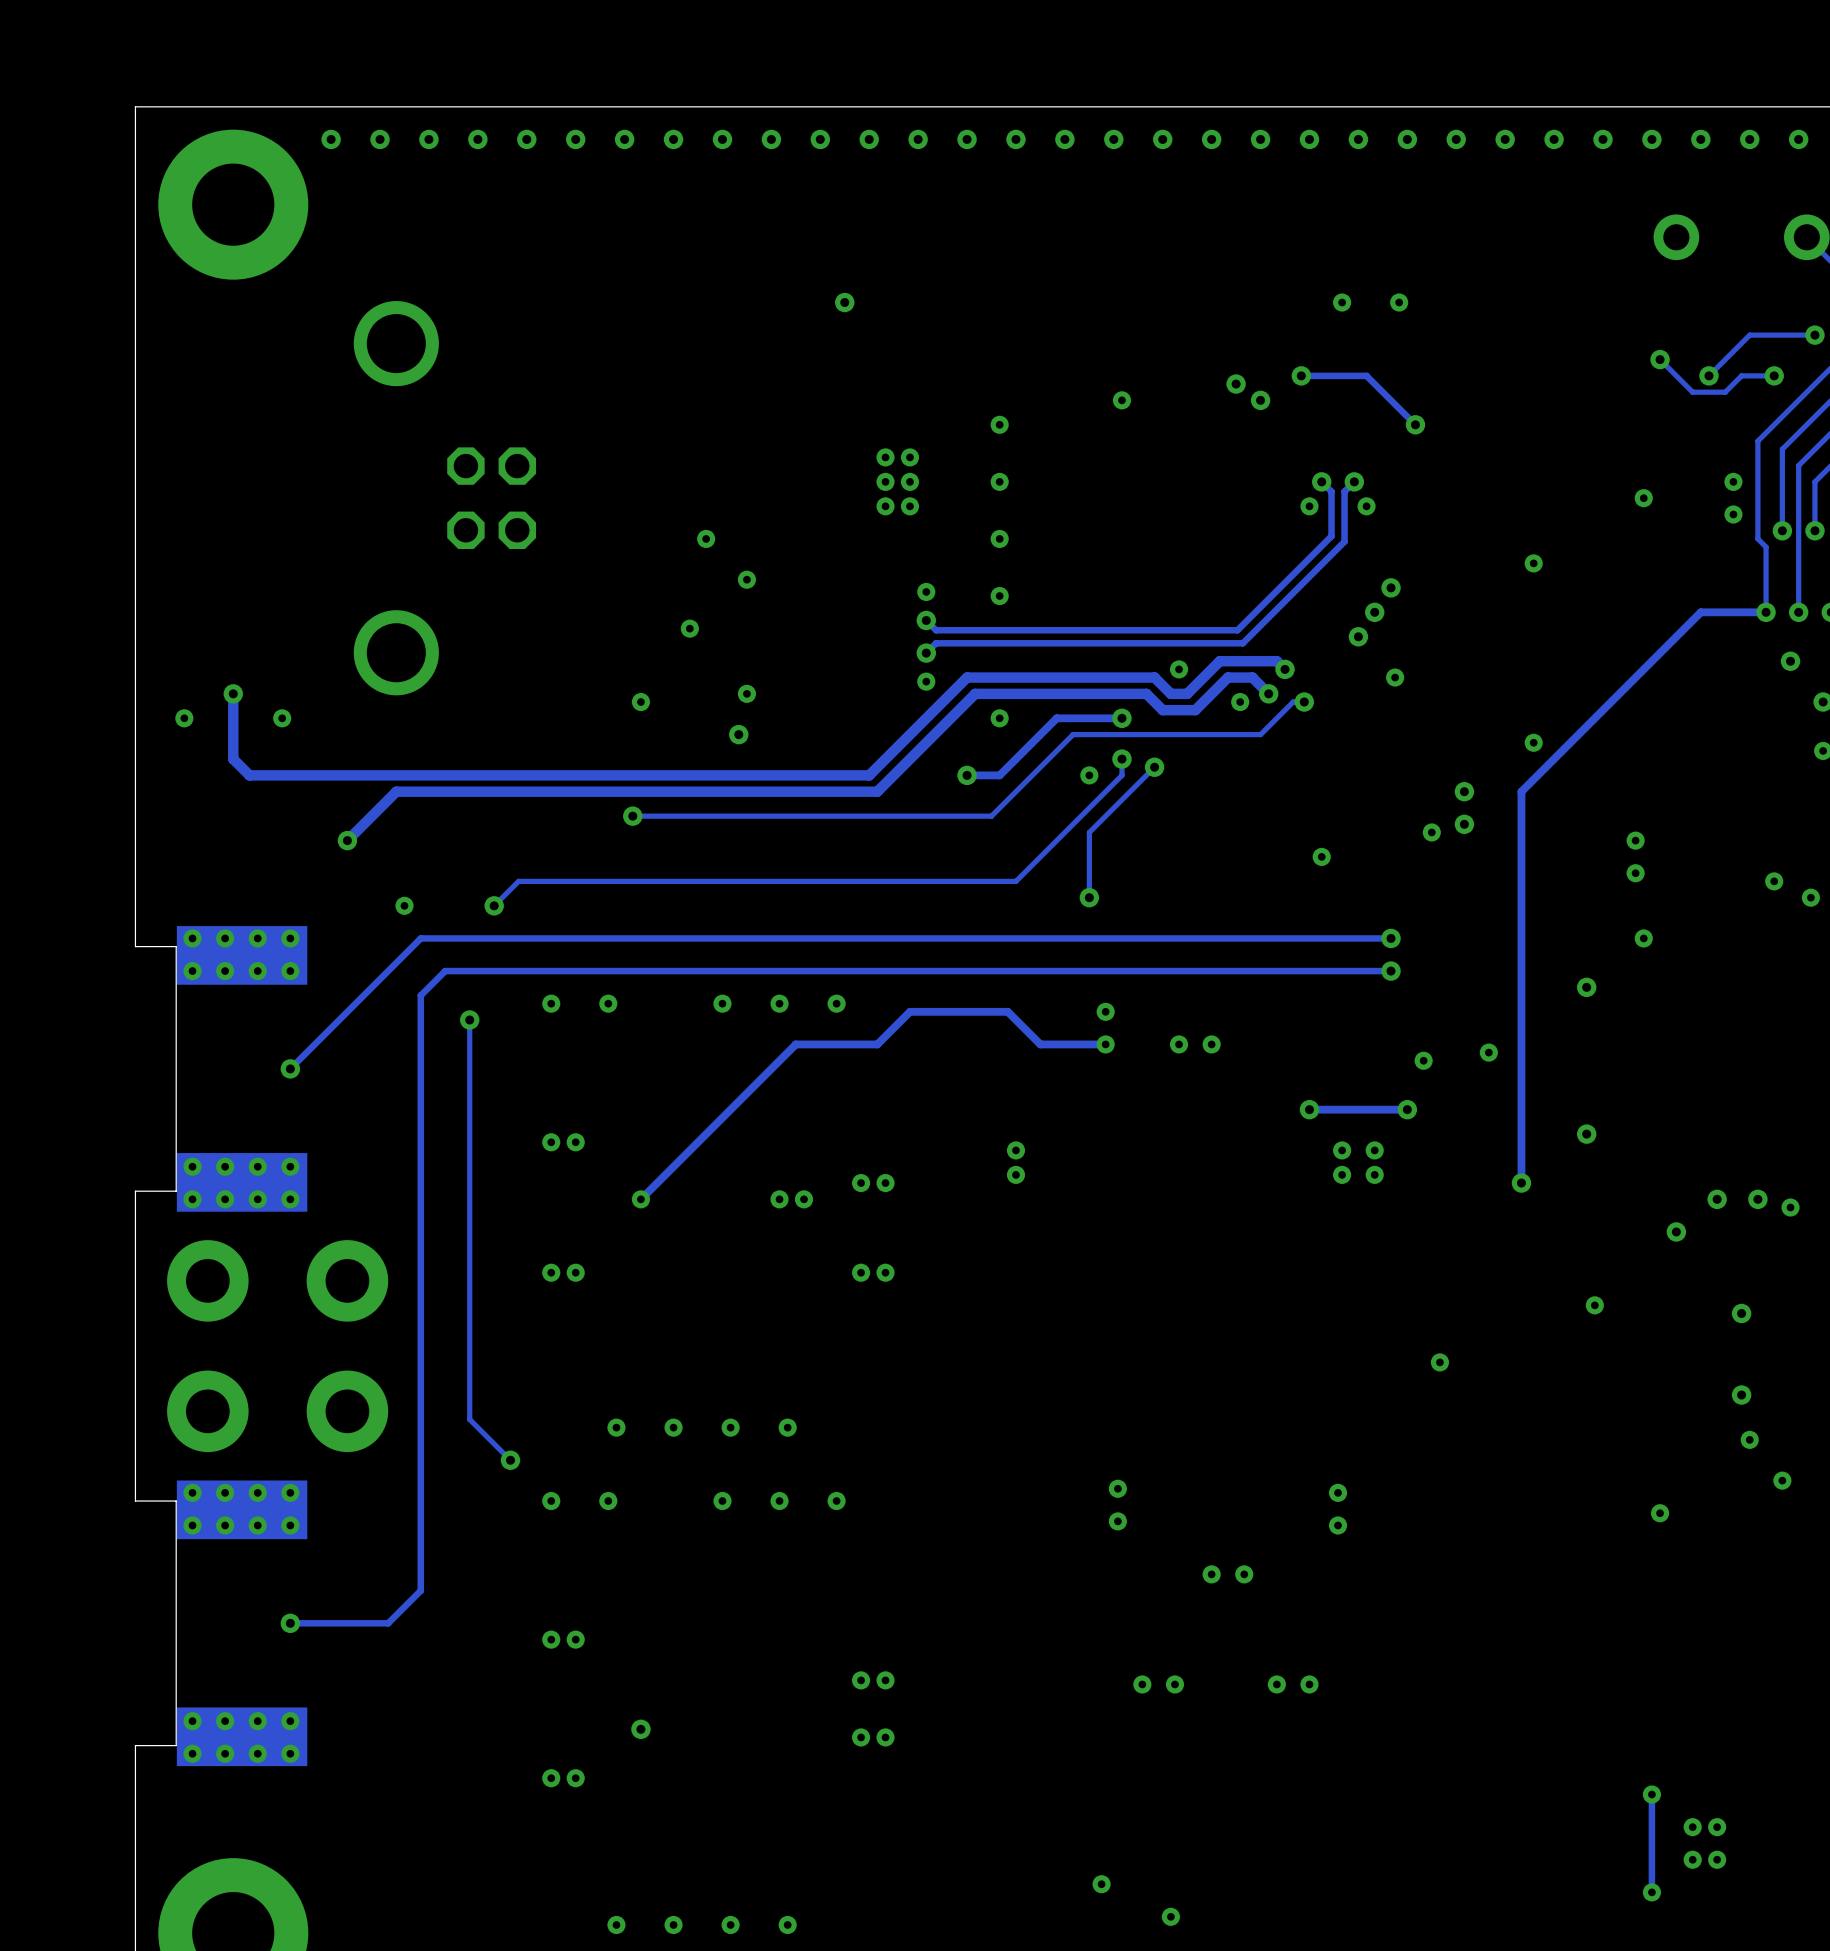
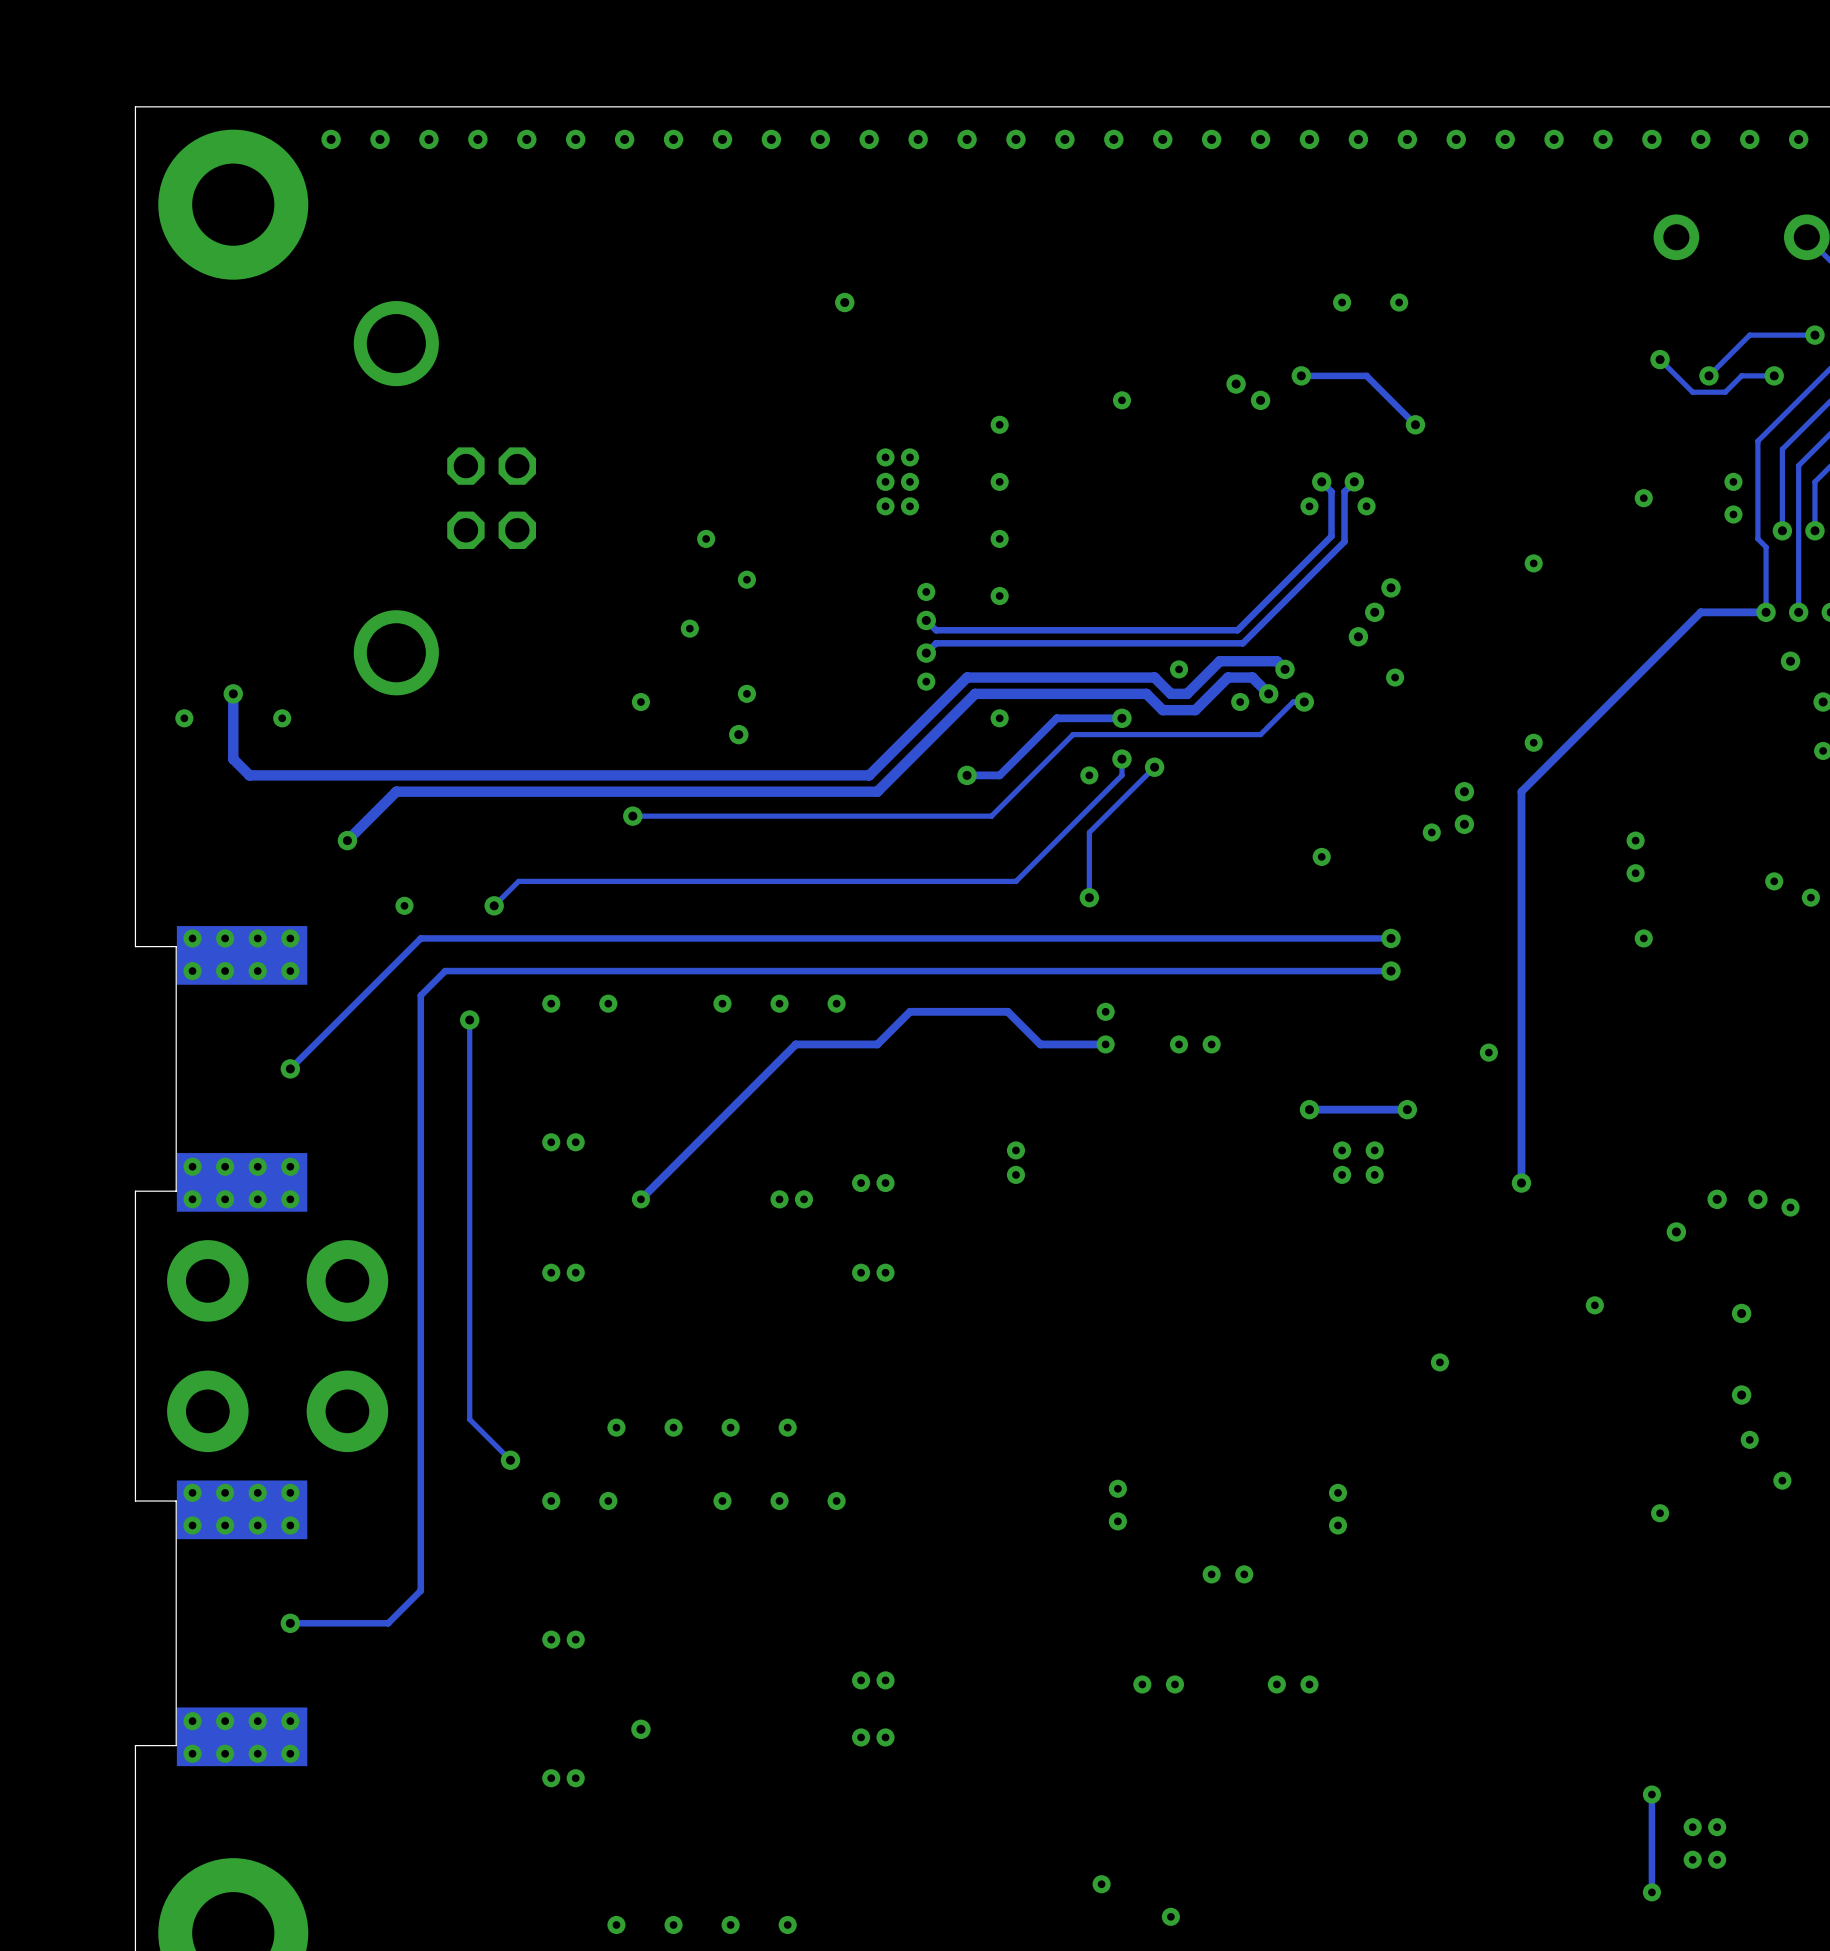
via: (1586, 987) -> none
via: (1423, 1060) -> none
via: (1586, 1134) -> none

